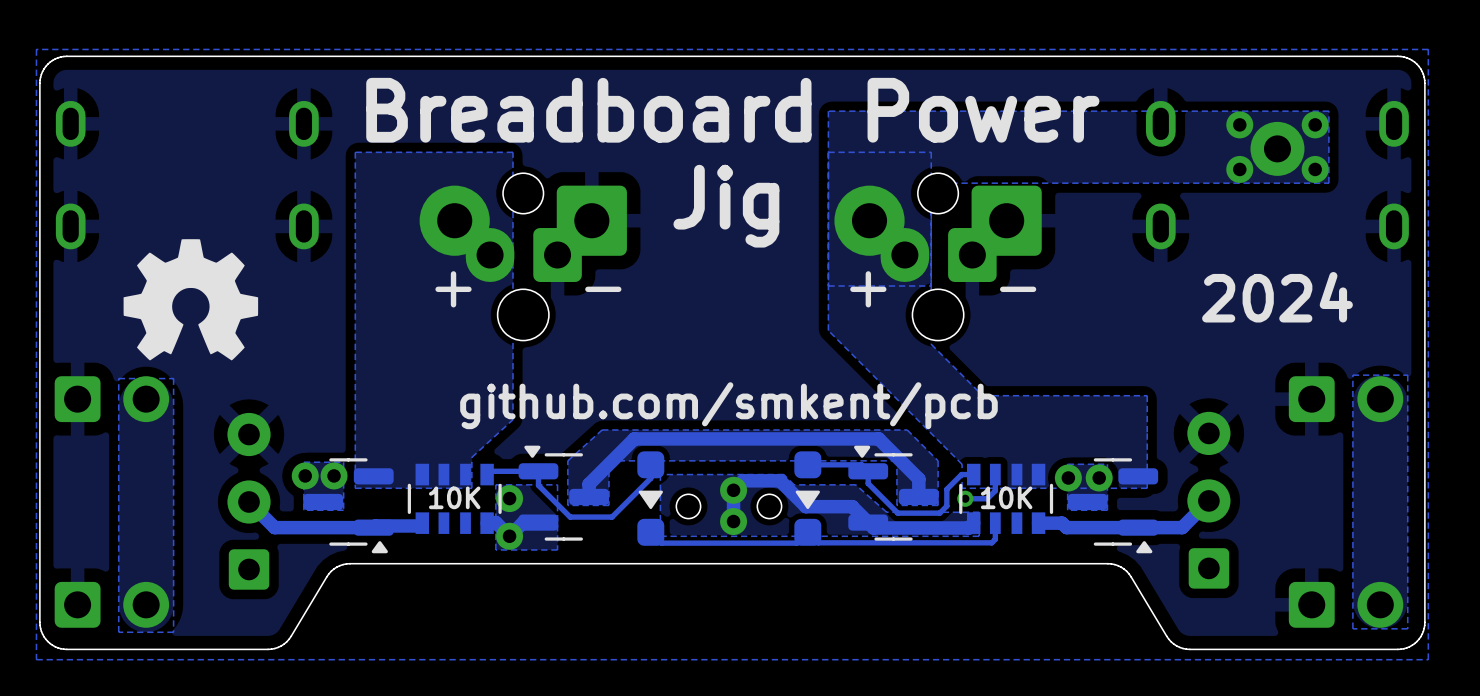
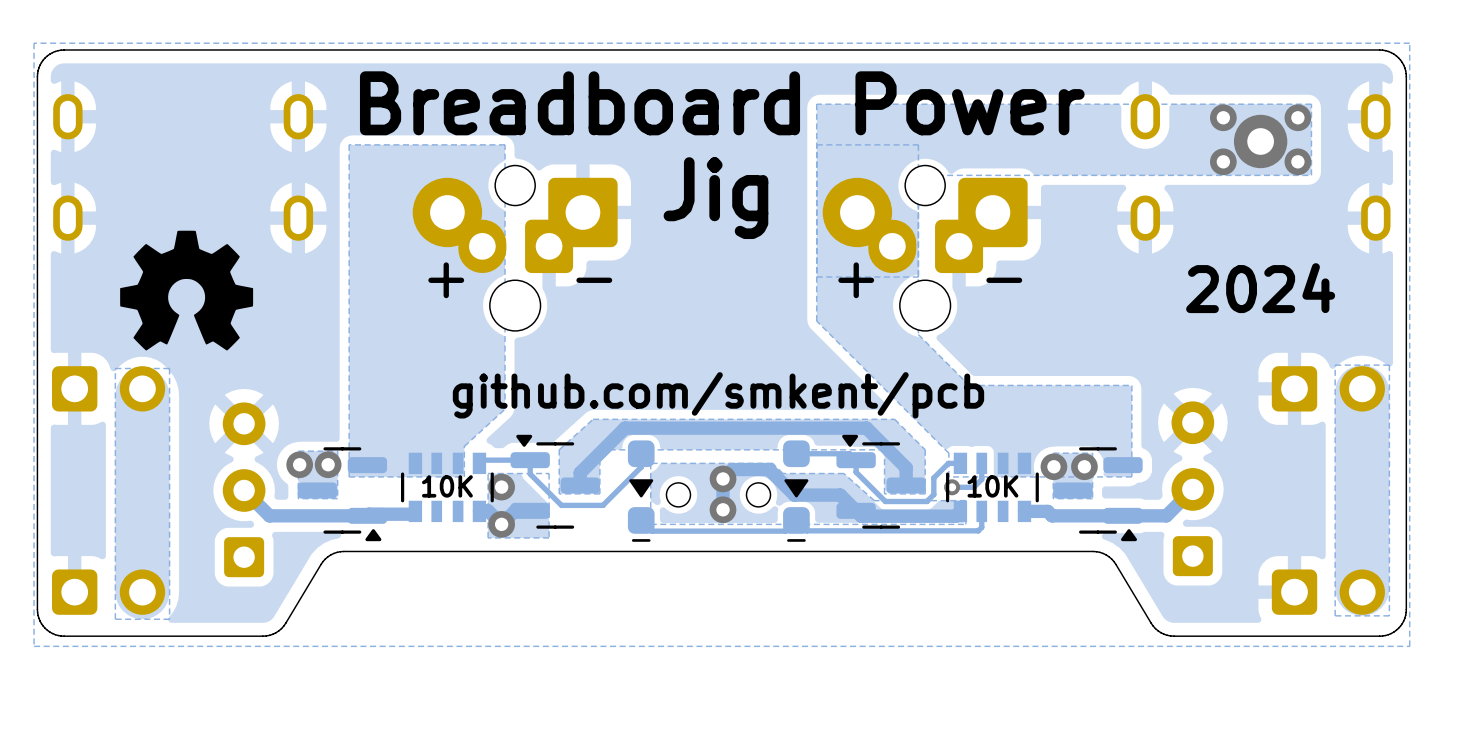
part footprint: [637, 451, 665, 546] -> [627, 440, 655, 542]
part footprint: [794, 451, 822, 546] -> [783, 440, 810, 542]

